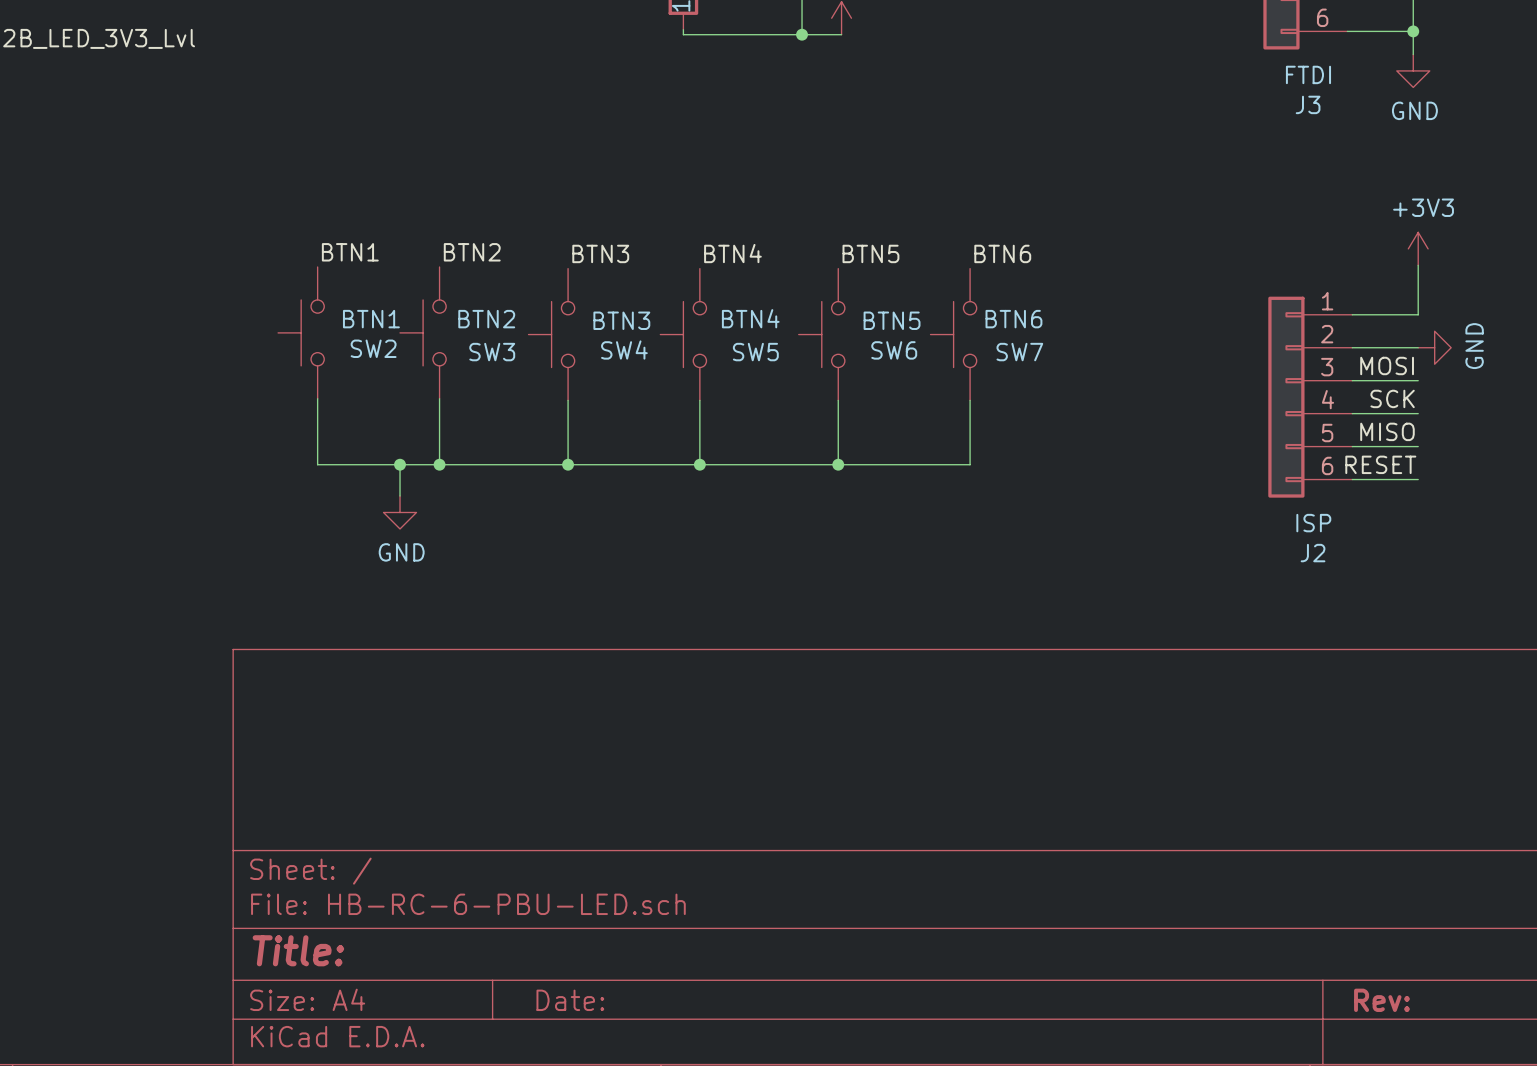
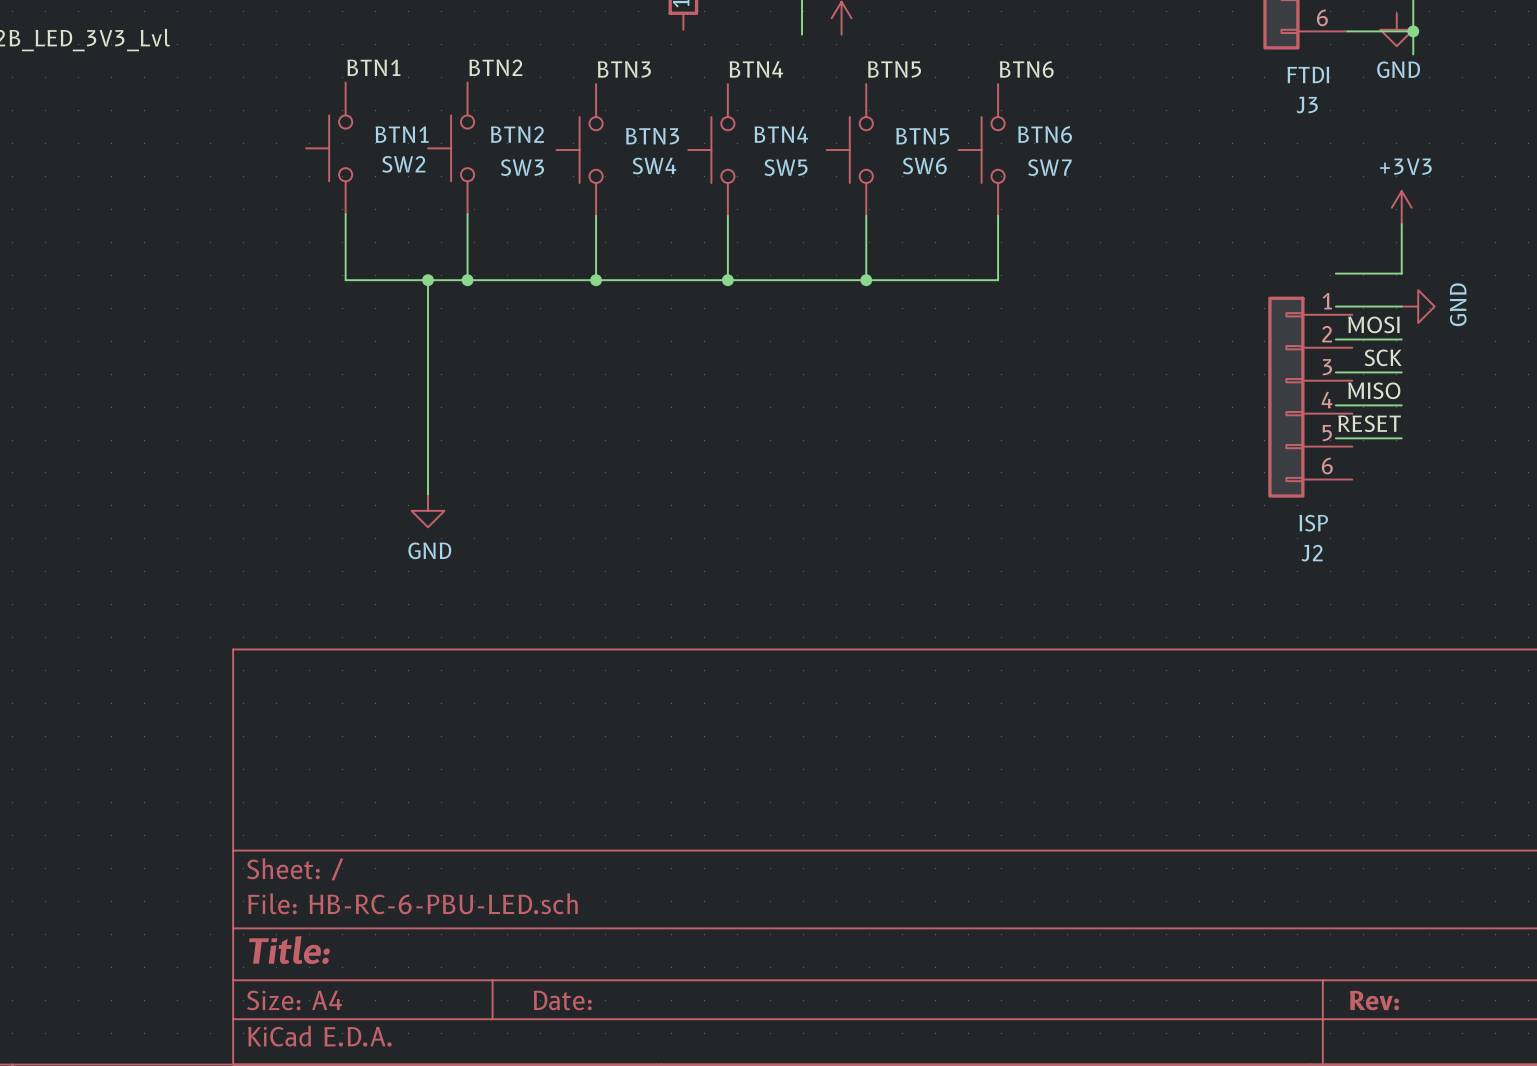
wire: (683, 29) (683, 34) (841, 34) -> none
junction: (802, 34) -> none
power symbol position: GND (1413, 70) -> GND (1396, 29)
power symbol position: +3V3 (1418, 248) -> +3V3 (1401, 207)
label position: BTN1 (350, 252) -> BTN1 (373, 67)
label position: BTN2 (472, 252) -> BTN2 (495, 67)
label position: BTN3 (600, 253) -> BTN3 (624, 69)
label position: BTN4 (732, 253) -> BTN4 (756, 69)
label position: BTN5 (870, 253) -> BTN5 (894, 69)
label position: BTN6 (1002, 253) -> BTN6 (1026, 69)
wire: (1418, 265) (1418, 314) (1352, 314) -> (1401, 224) (1401, 273) (1335, 273)
wire: none -> (428, 280) (428, 494)
junction: none -> (428, 280)
junction: none -> (467, 280)
junction: none -> (596, 280)
junction: none -> (727, 280)
junction: none -> (866, 280)
SW2 position: (301, 332) -> (329, 148)
SW3 position: (423, 332) -> (451, 148)
SW4 position: (551, 334) -> (579, 150)
SW5 position: (683, 334) -> (711, 150)
SW6 position: (821, 334) -> (849, 150)
SW7 position: (953, 334) -> (981, 150)
wire: (1352, 347) (1418, 347) -> (1335, 306) (1401, 306)
power symbol position: GND (1434, 347) -> GND (1418, 306)
label position: MOSI (1387, 365) -> MOSI (1373, 324)
wire: (1352, 380) (1418, 380) -> (1335, 339) (1401, 339)
wire: (317, 398) (317, 464) (970, 464) (970, 400) -> (345, 214) (345, 280) (998, 280) (998, 215)
wire: (439, 398) (439, 464) -> (467, 214) (467, 280)
label position: SCK (1392, 398) -> SCK (1383, 357)
wire: (568, 400) (568, 464) -> (596, 215) (596, 280)
wire: (699, 400) (699, 464) -> (727, 215) (727, 280)
wire: (838, 400) (838, 464) -> (866, 215) (866, 280)
wire: (1352, 413) (1418, 413) -> (1335, 372) (1401, 372)
label position: MISO (1387, 431) -> MISO (1374, 390)
wire: (1352, 446) (1418, 446) -> (1335, 405) (1401, 405)
wire: (400, 464) (400, 496) -> none
junction: (400, 464) -> none
junction: (439, 464) -> none
junction: (568, 464) -> none
junction: (699, 464) -> none
junction: (838, 464) -> none
label position: RESET (1380, 464) -> RESET (1369, 423)
wire: (1352, 479) (1418, 479) -> (1335, 438) (1401, 438)
power symbol position: GND (400, 512) -> GND (428, 510)

